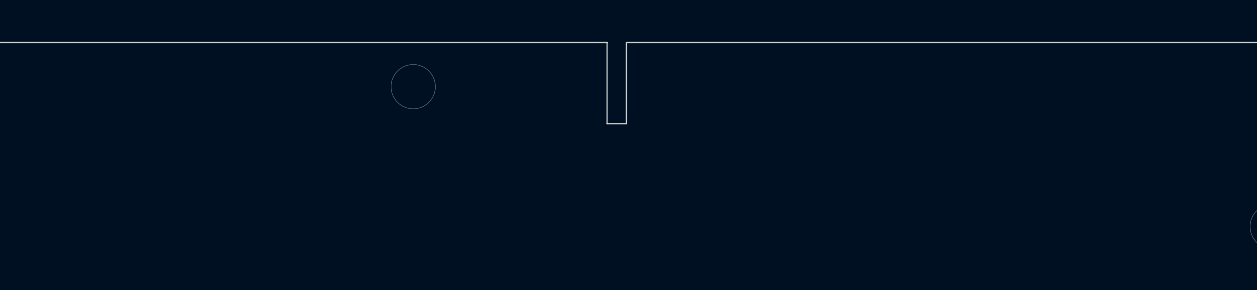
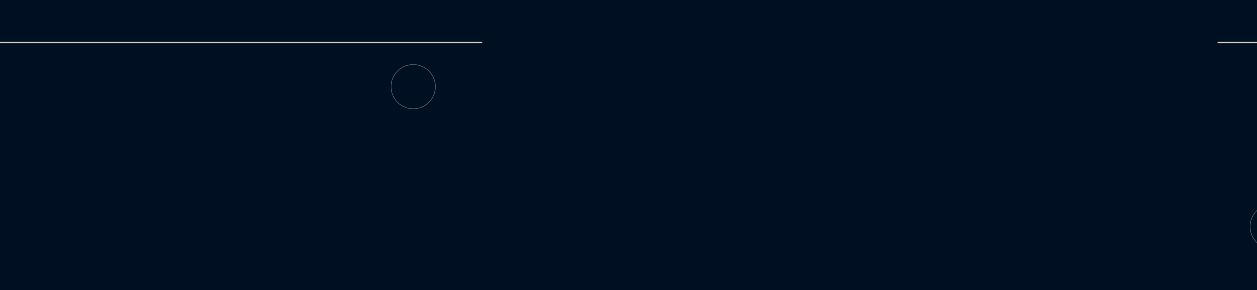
board edge: (481, 42) (607, 42) (607, 123) (626, 123) (626, 42) (1217, 42) -> none

